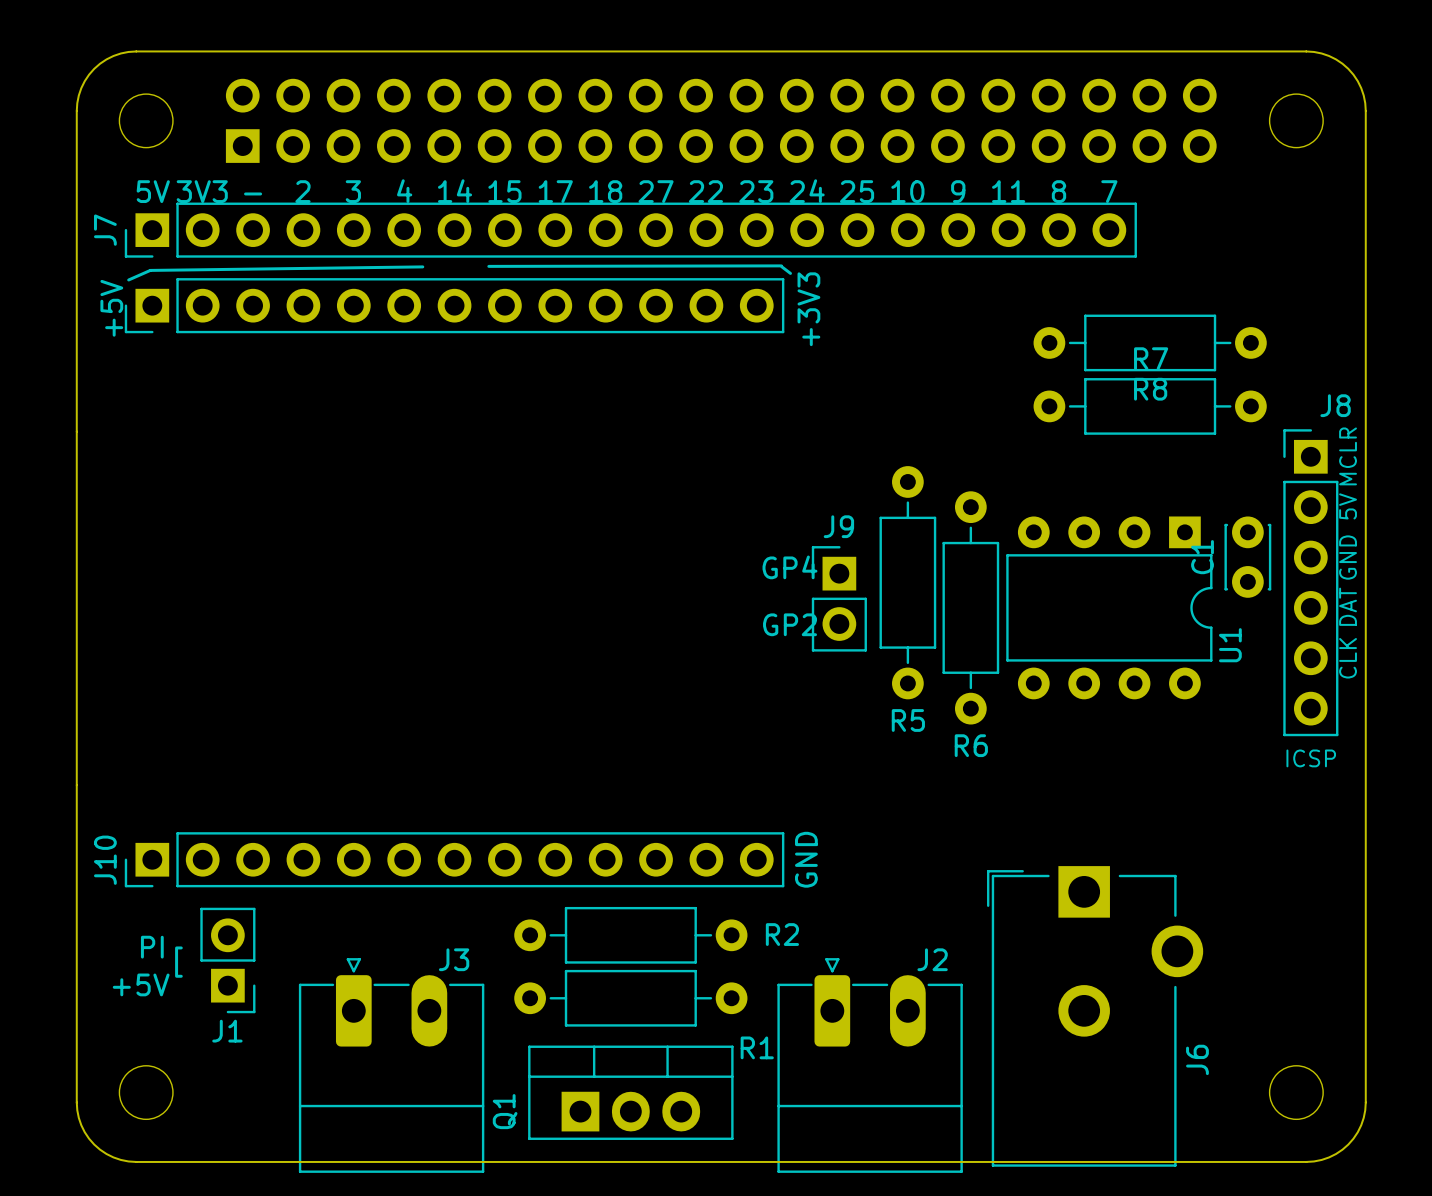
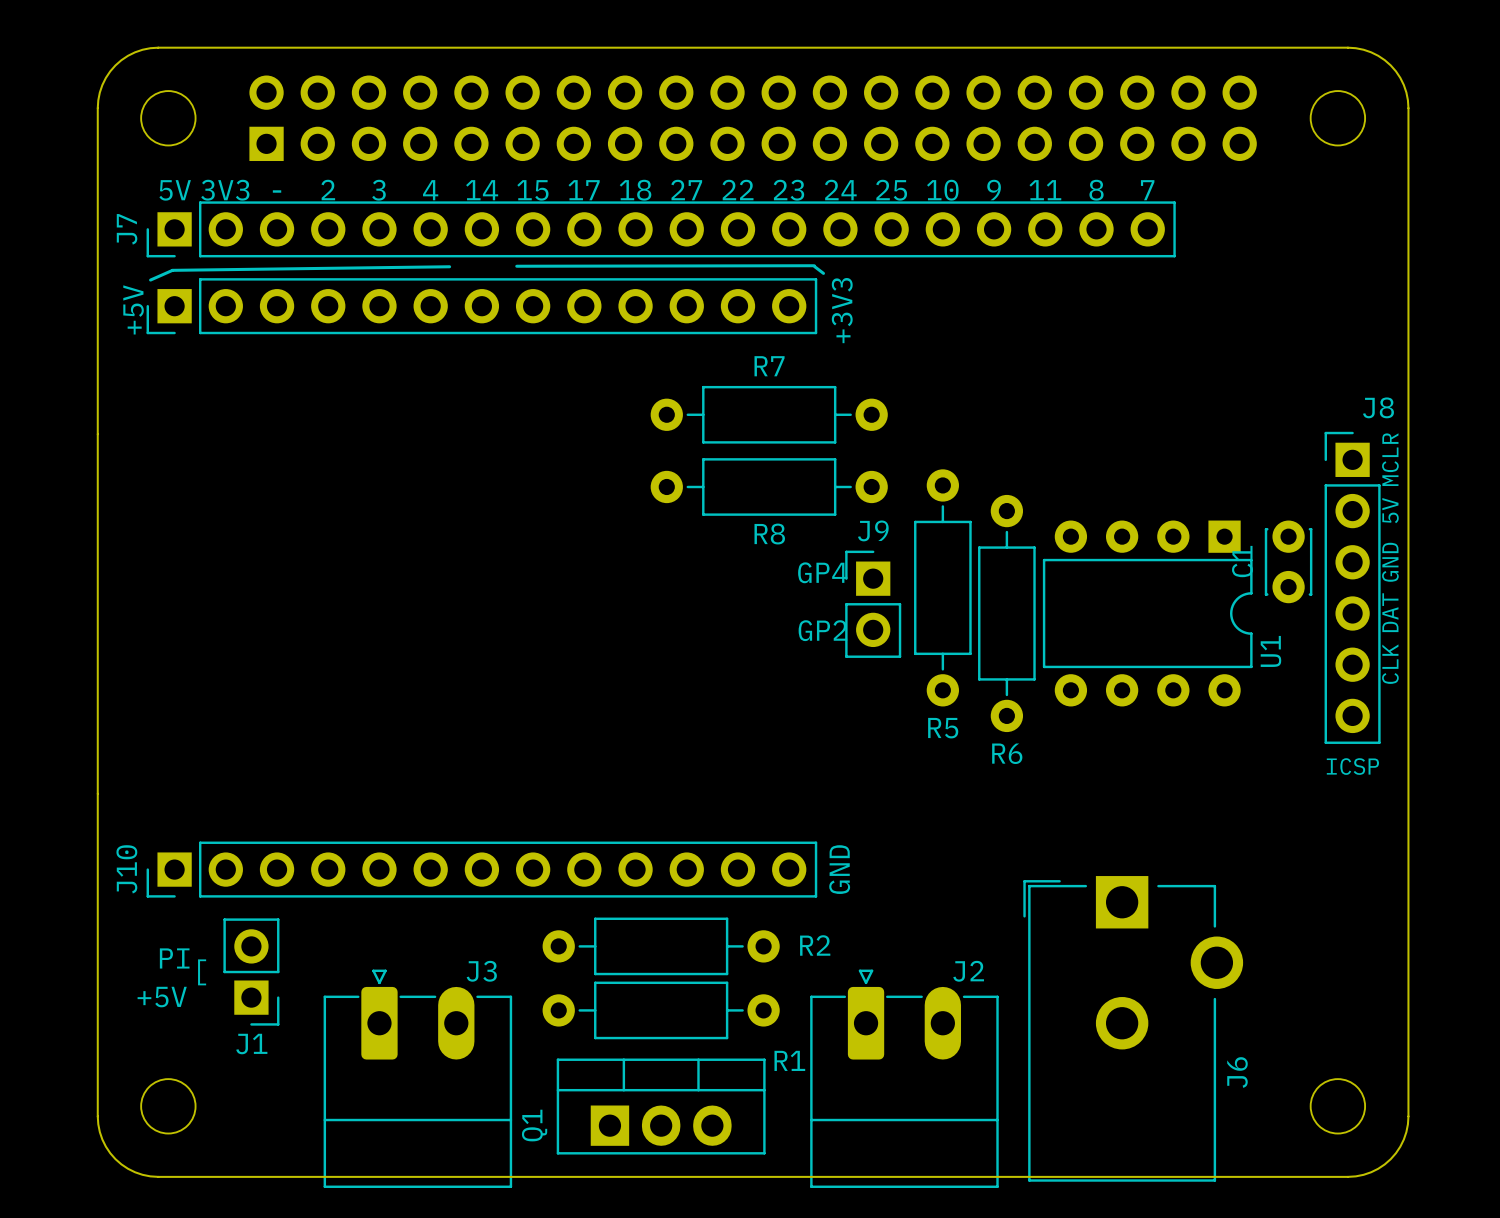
R8 position: (1150, 342) -> (769, 486)
R7 position: (1150, 406) -> (769, 414)

